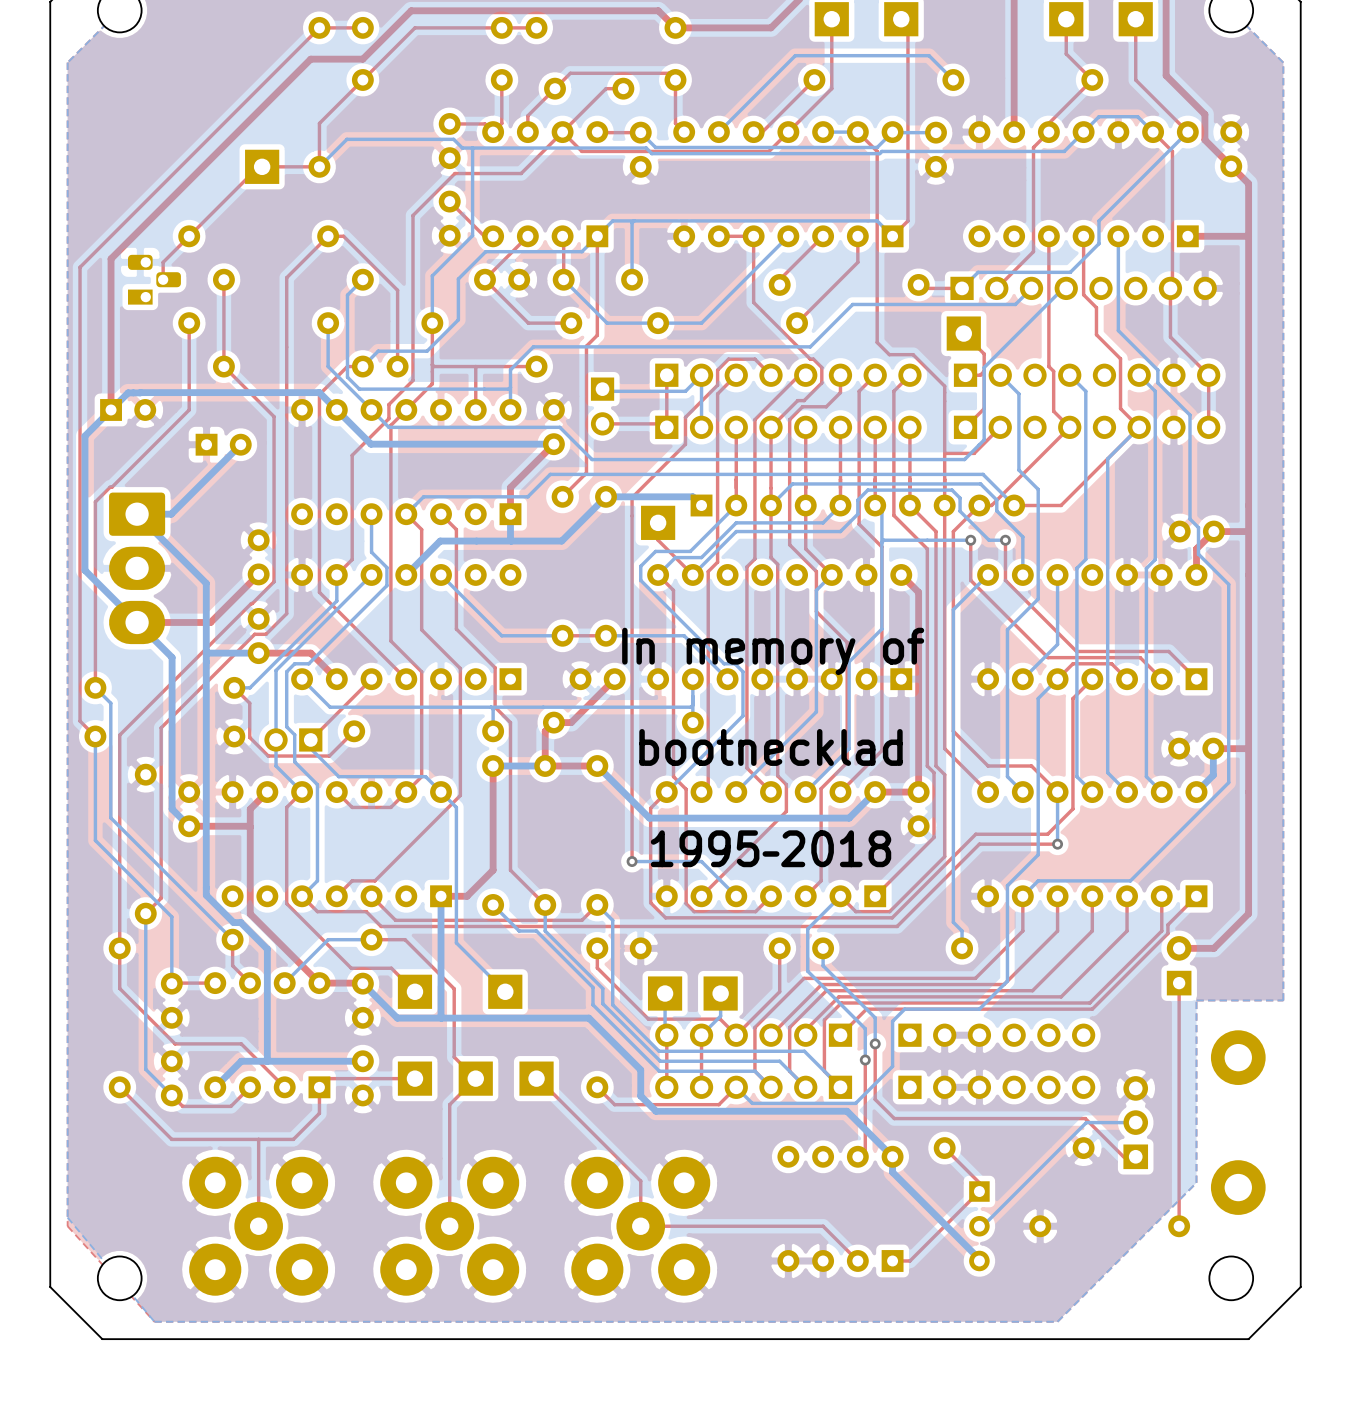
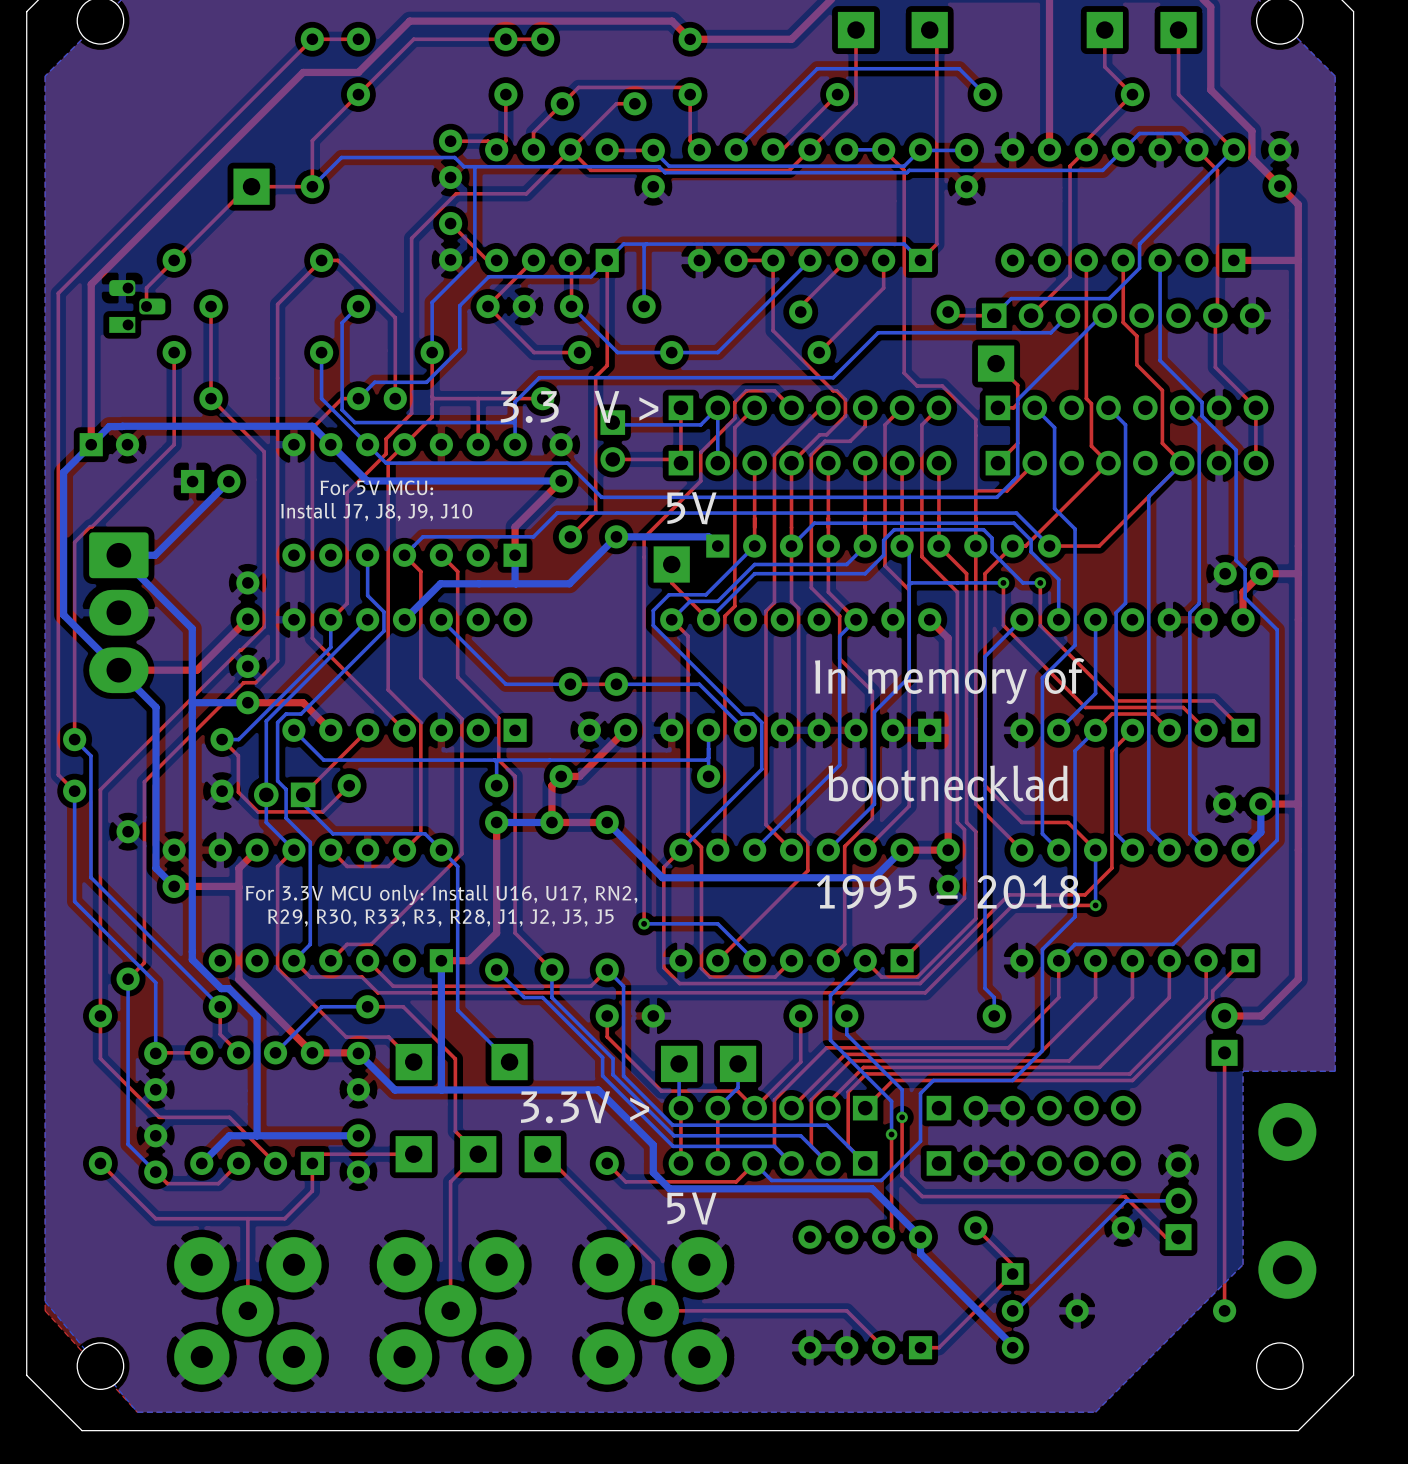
text: none -> 3.3 V > (579, 406)
text: none -> For 5V MCU: (376, 487)
text: none -> 5V (691, 508)
text: none -> Install J7, J8, J9, J10 (376, 512)
text position: In memory of (773, 651) -> In memory of (949, 681)
text position: bootnecklad (771, 747) -> bootnecklad (948, 783)
text: none -> For 3.3V MCU only: Install U16, U17, RN2, (441, 895)
text: 1995–2018 (771, 848) -> 1995 – 2018 (948, 892)
text: none -> R29, R30, R33, R3, R28, J1, J2, J3, J5 (440, 917)
text: none -> 3.3V > (585, 1107)
text: none -> 5V (691, 1208)

